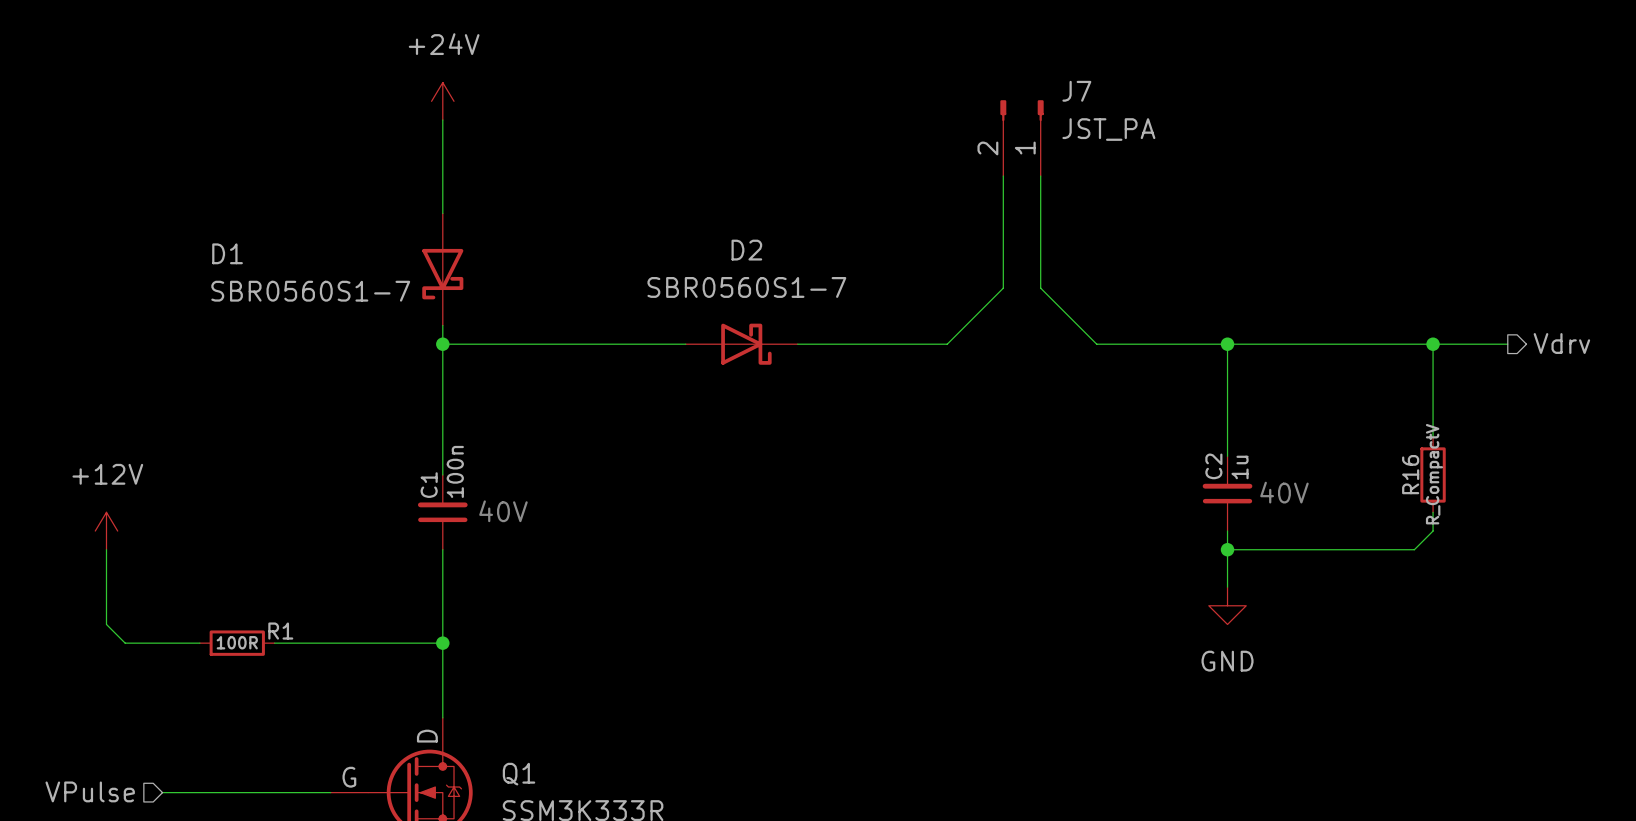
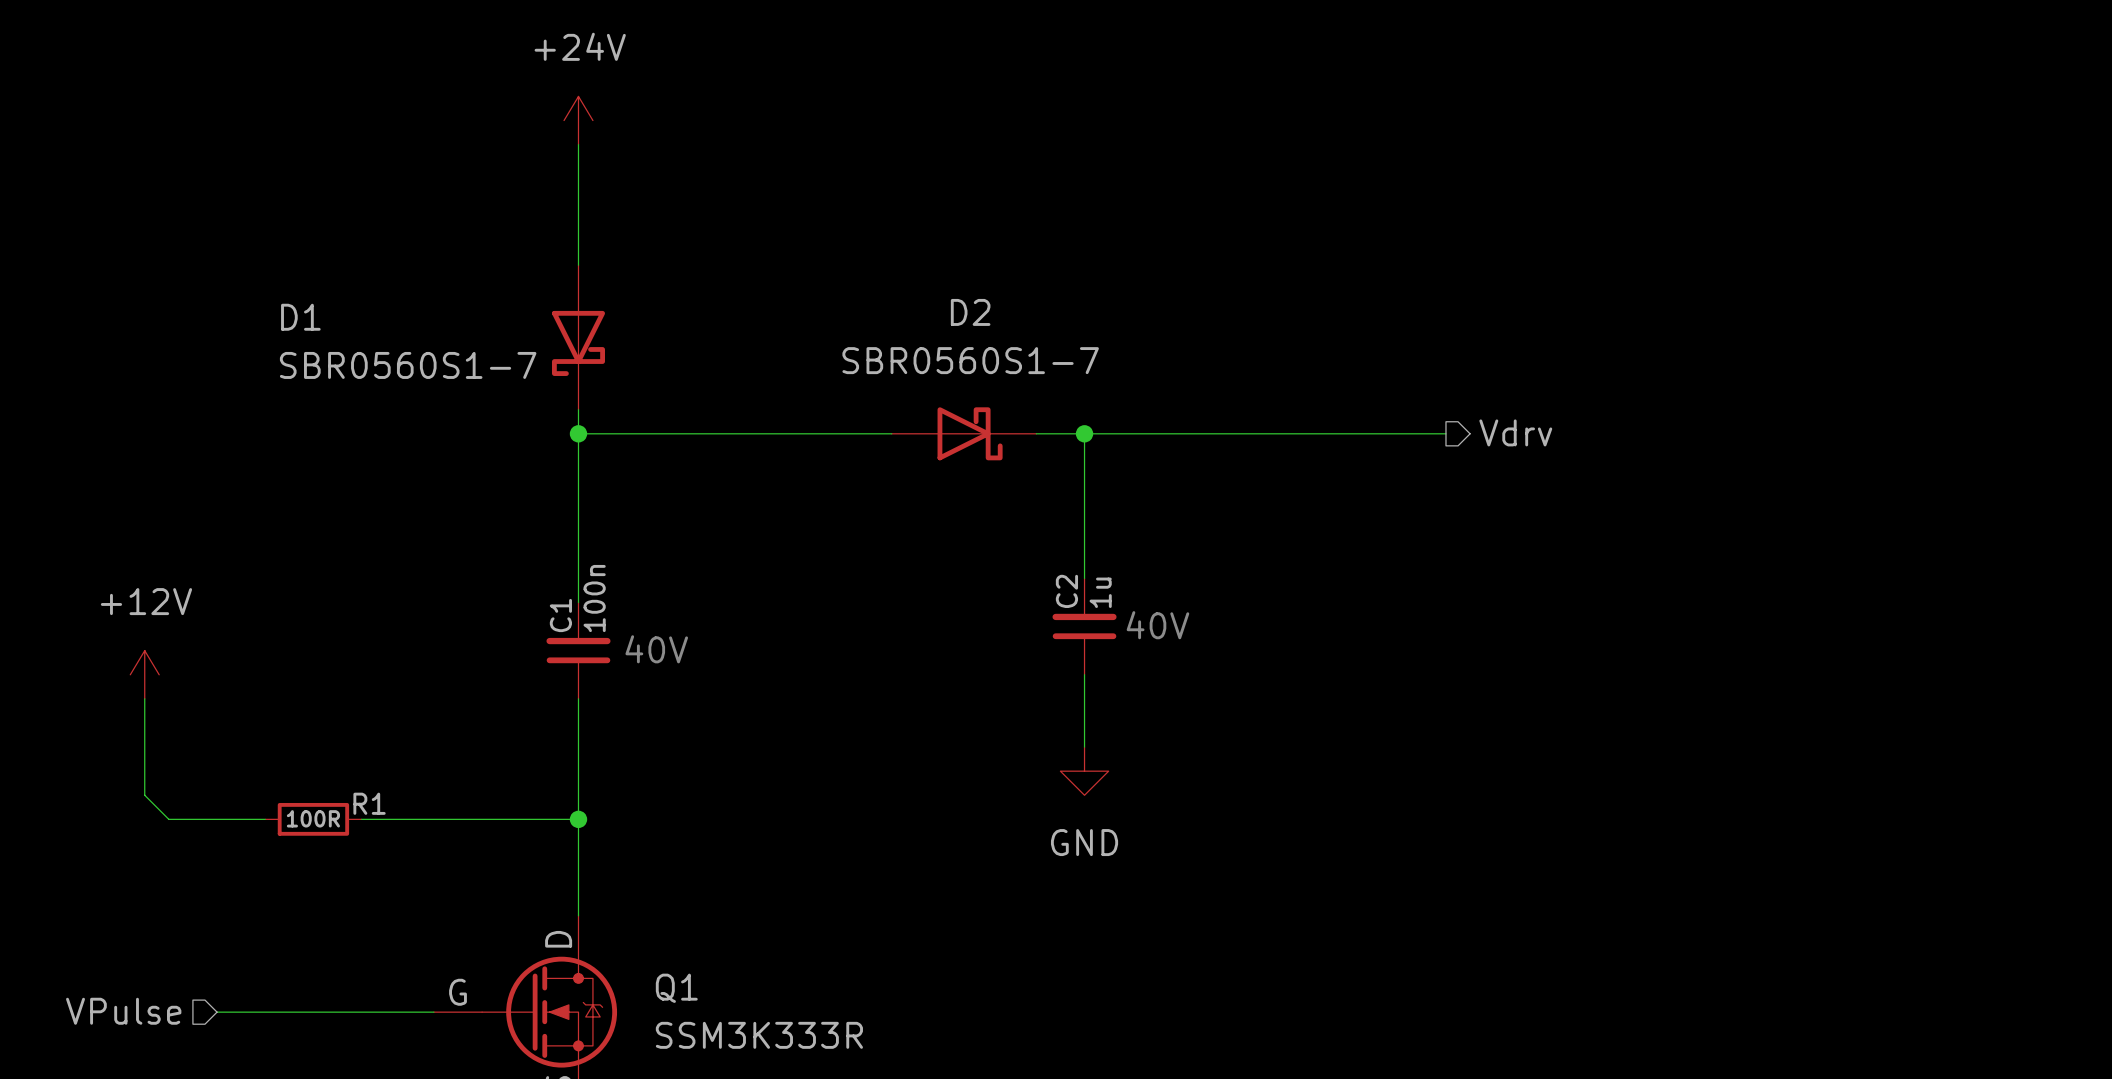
J7: JST_PA (1022, 138) -> none
wire: (1003, 176) (1003, 288) (947, 344) -> (1421, 433) (1229, 433)
wire: (1040, 176) (1040, 288) (1096, 344) -> none
hierarchical label: none -> Vdrv (1515, 432)
hierarchical label: Vdrv (1561, 343) -> none
wire: none -> (1084, 433) (1084, 578)
junction: none -> (1084, 433)
wire: (1115, 344) (1507, 344) -> none
wire: (1227, 344) (1227, 456) -> none
junction: (1227, 344) -> none
wire: (1433, 344) (1433, 437) -> none
junction: (1433, 344) -> none
R16: R_CompactV (1433, 474) -> none
text: none -> 40V (1157, 625)
text: 40V (1284, 492) -> none
C2 position: (1227, 493) -> (1084, 626)
wire: (1433, 512) (1433, 531) (1414, 549) (1227, 549) -> none
wire: none -> (1084, 674) (1084, 747)
wire: (1227, 531) (1227, 587) -> none
junction: (1227, 549) -> none
power symbol: none -> GND (1084, 771)
power symbol: GND (1227, 605) -> none

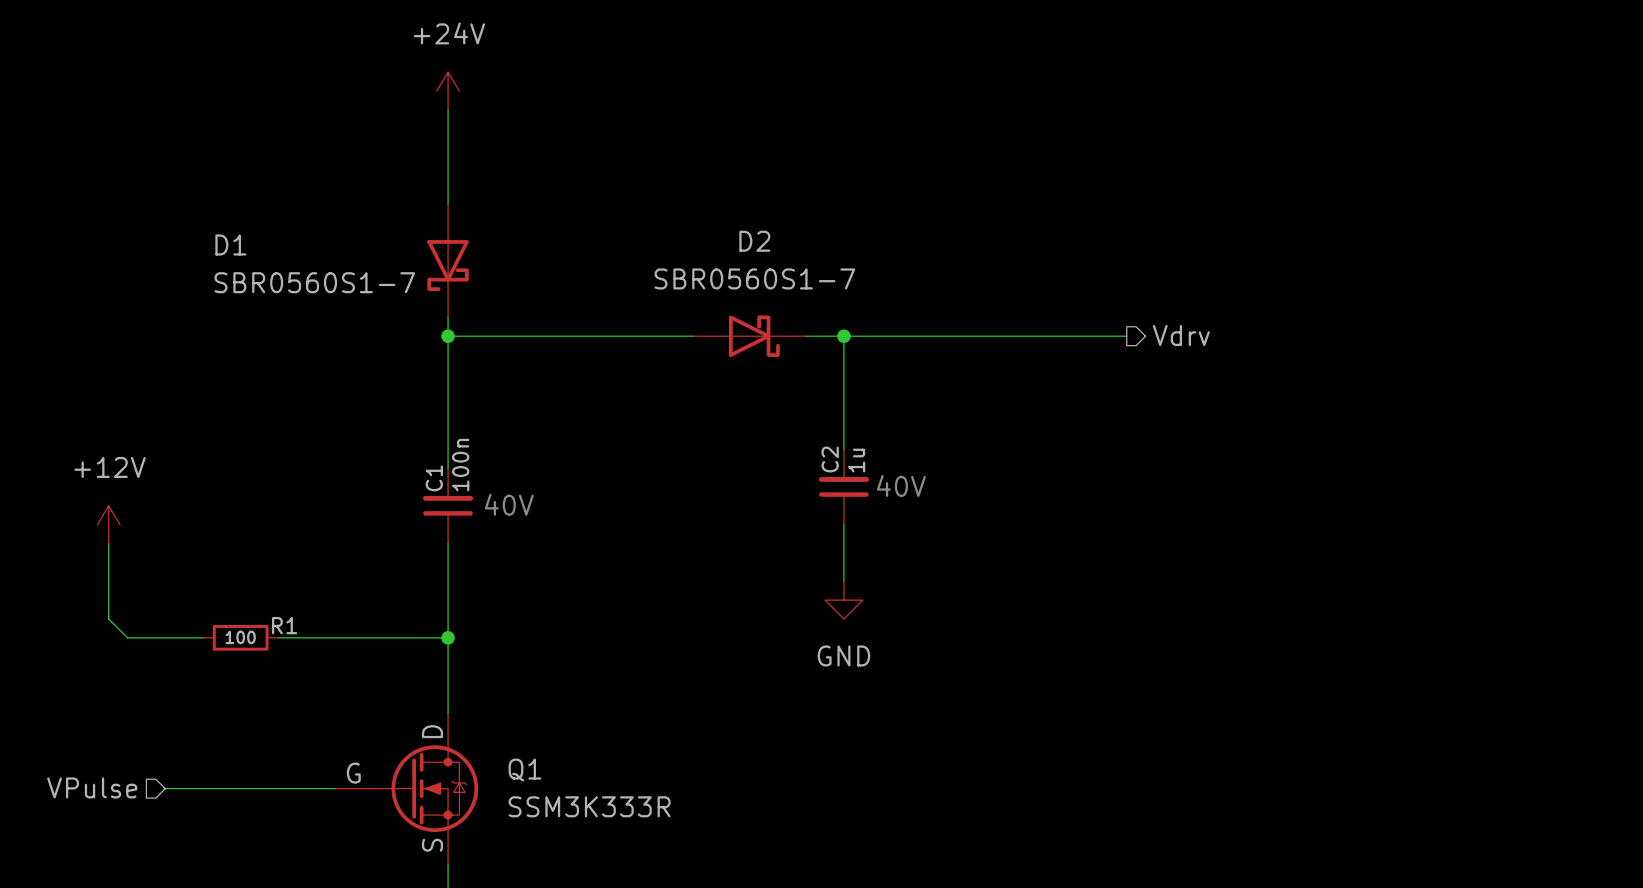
R1 value: 100R (313, 818) -> 100 (240, 637)

